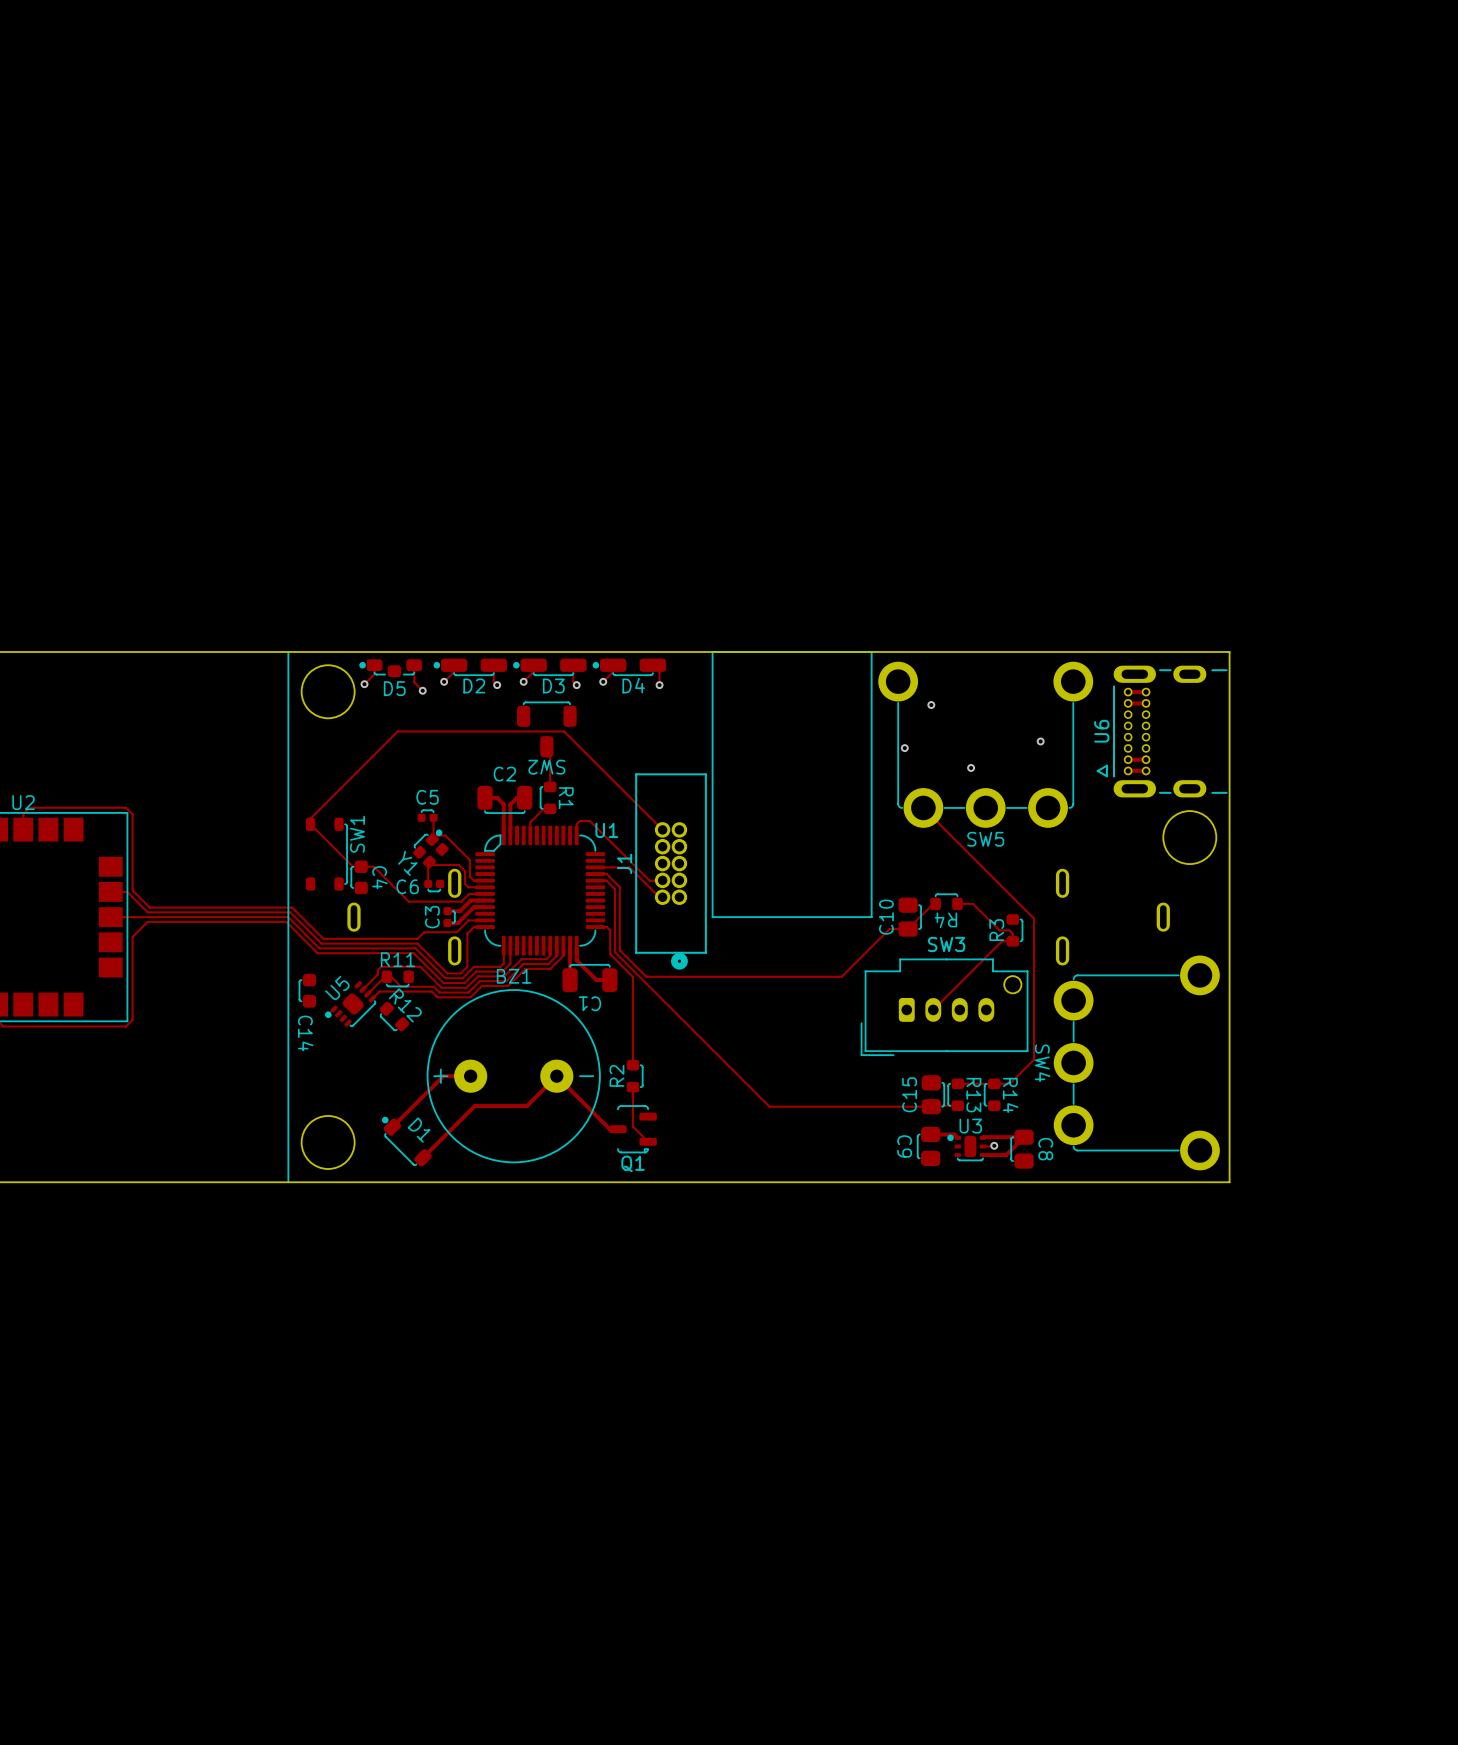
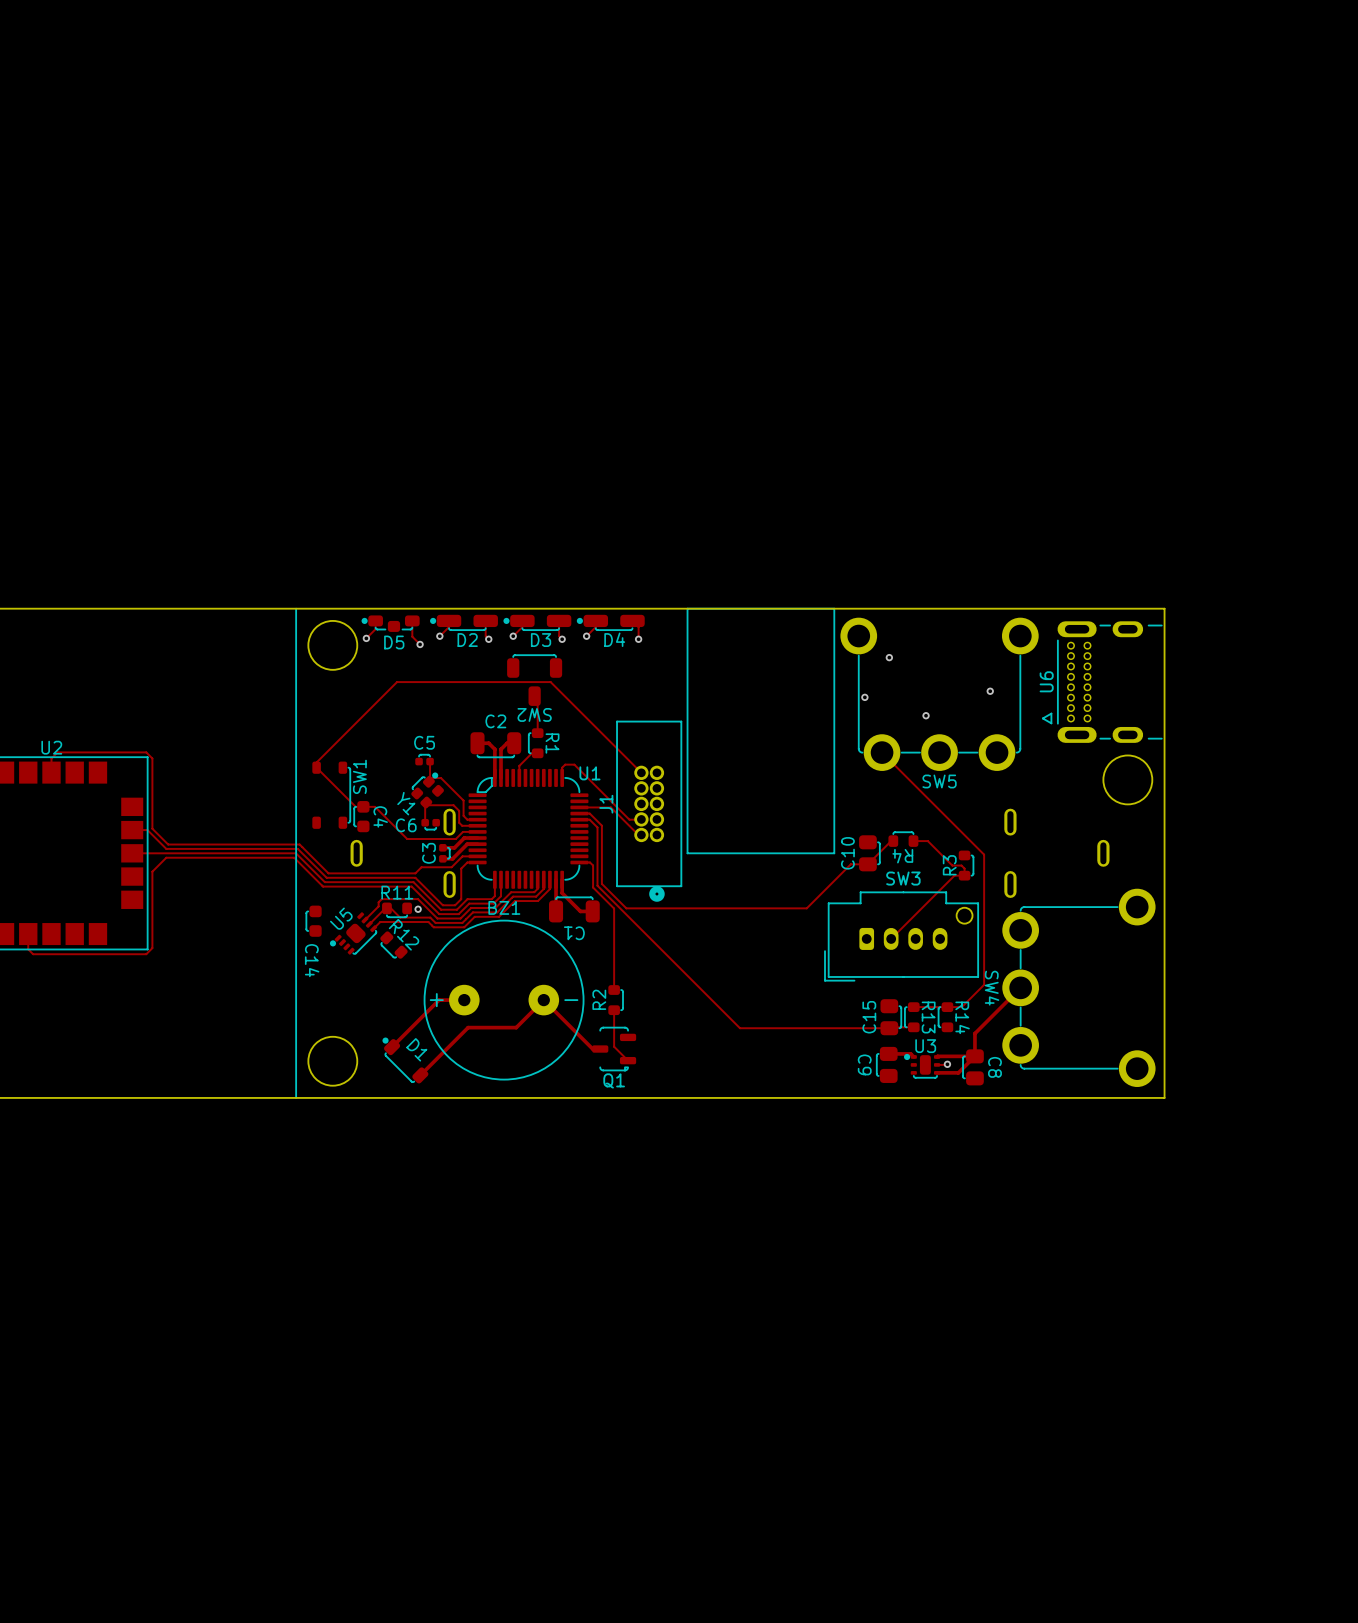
U6 footprint: [1096, 665, 1228, 798] -> [1041, 621, 1163, 743]
via: none -> (418, 909)
track: none -> (1020, 987) (974, 1033) (974, 1056)

